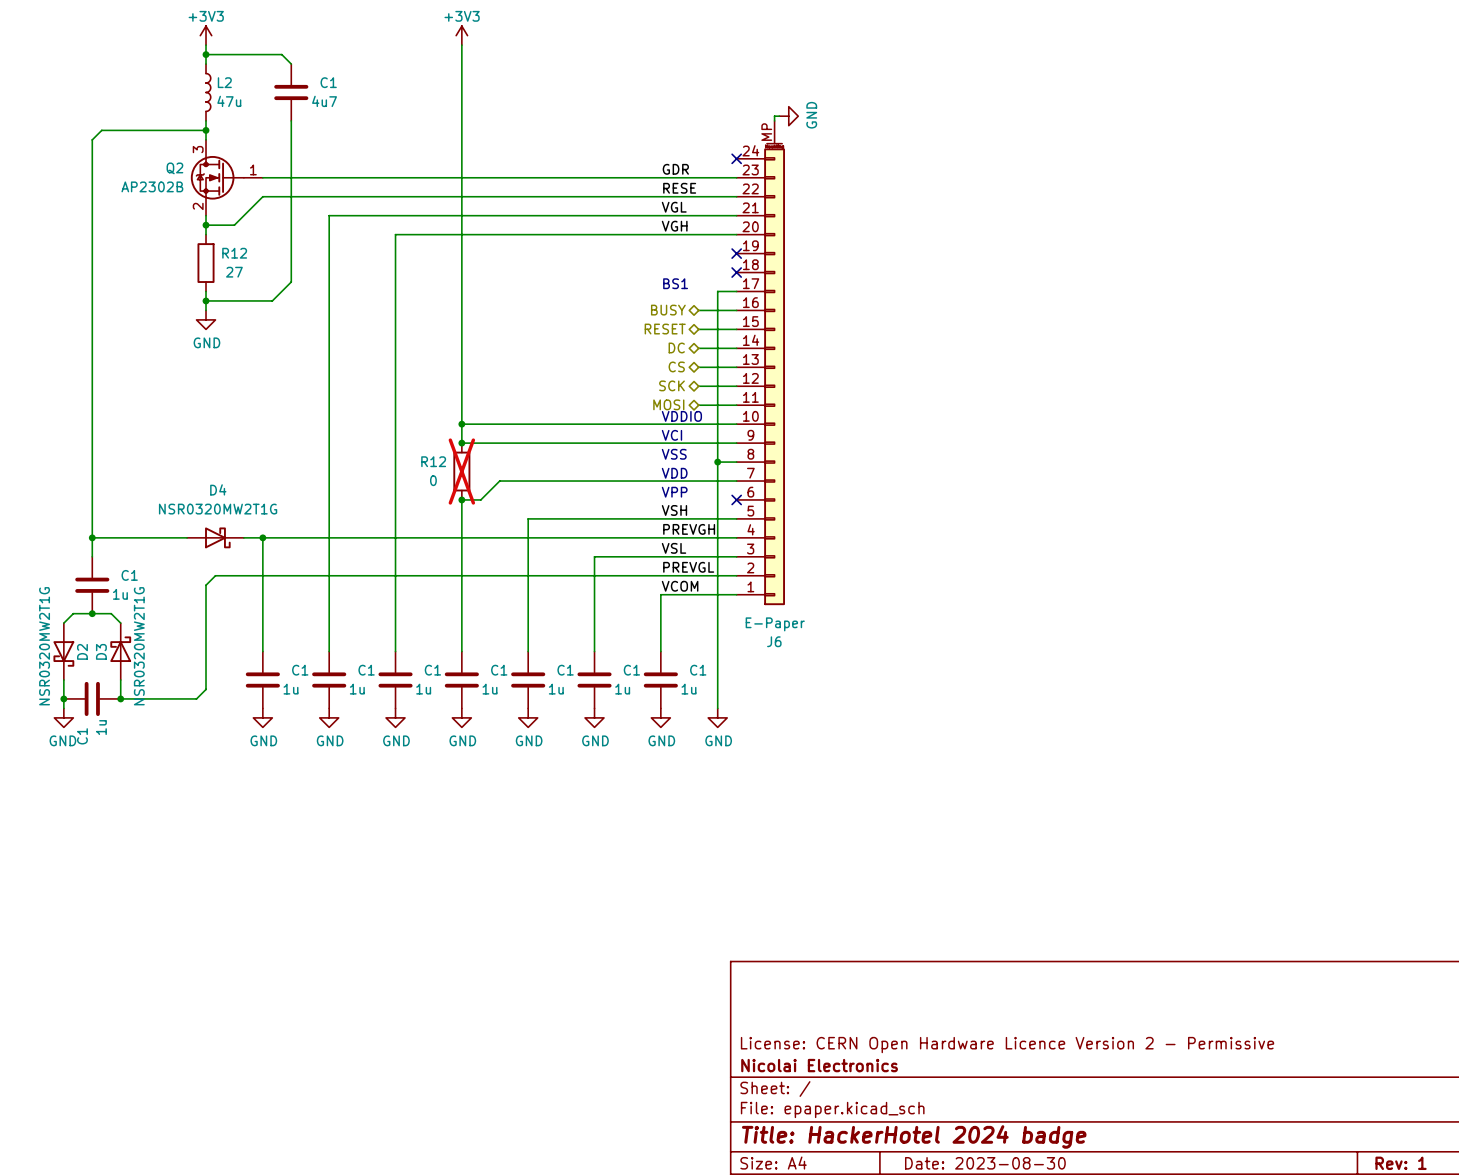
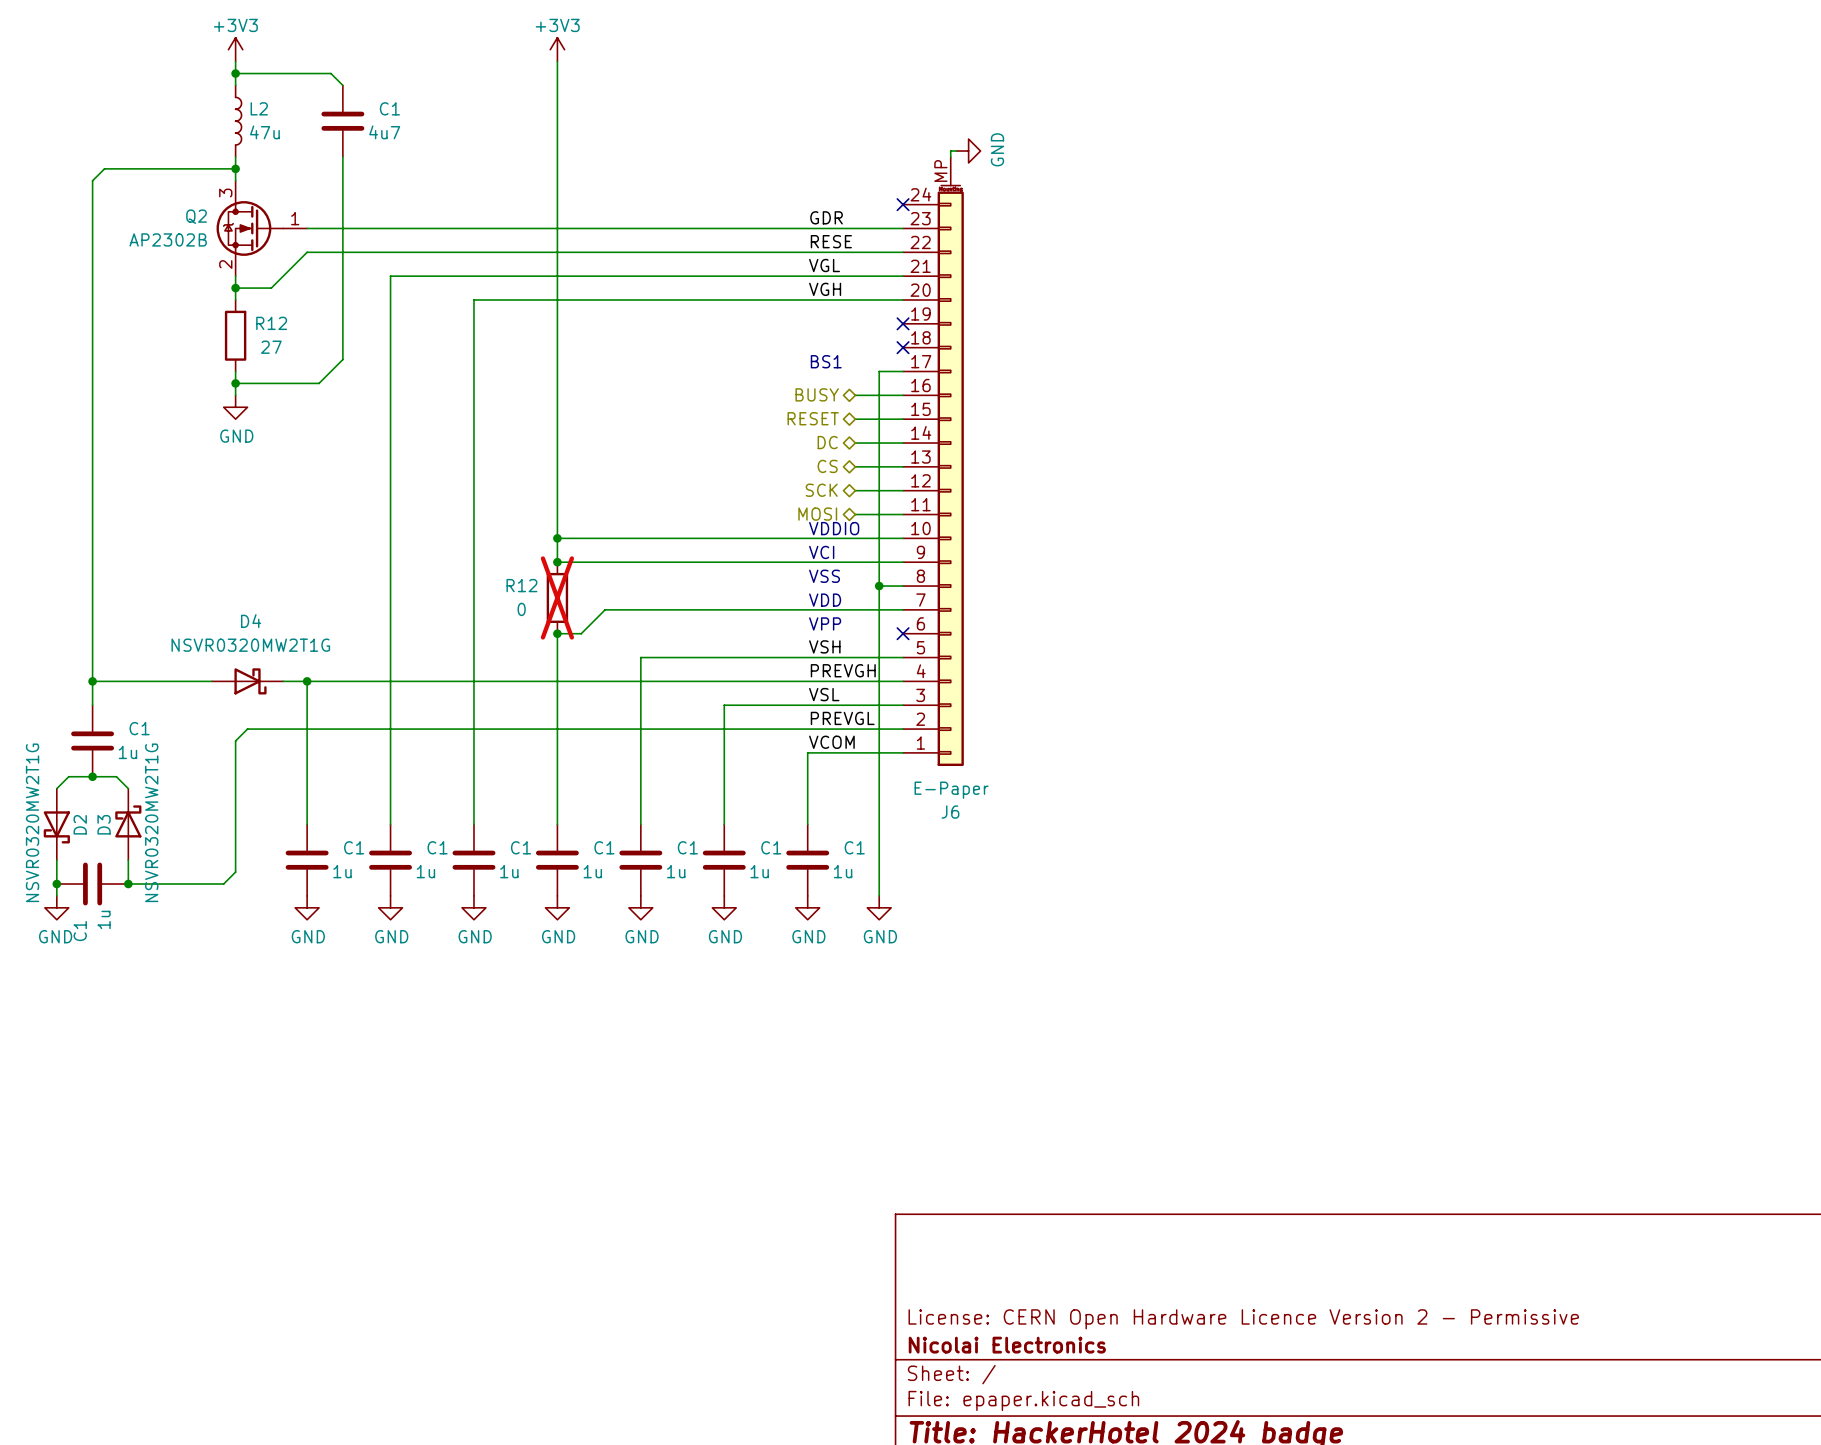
D4 value: NSR0320MW2T1G (218, 509) -> NSVR0320MW2T1G (250, 645)
D2 value: NSR0320MW2T1G (44, 646) -> NSVR0320MW2T1G (32, 822)
D3 value: NSR0320MW2T1G (139, 646) -> NSVR0320MW2T1G (151, 822)

